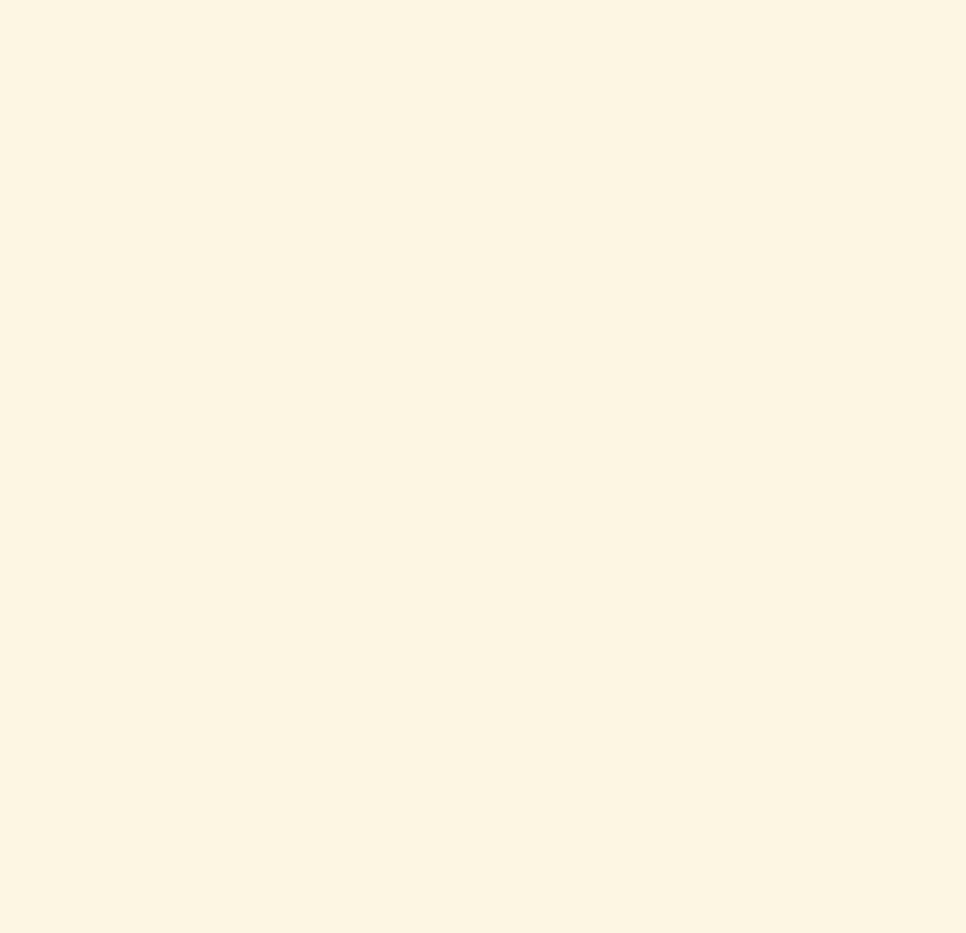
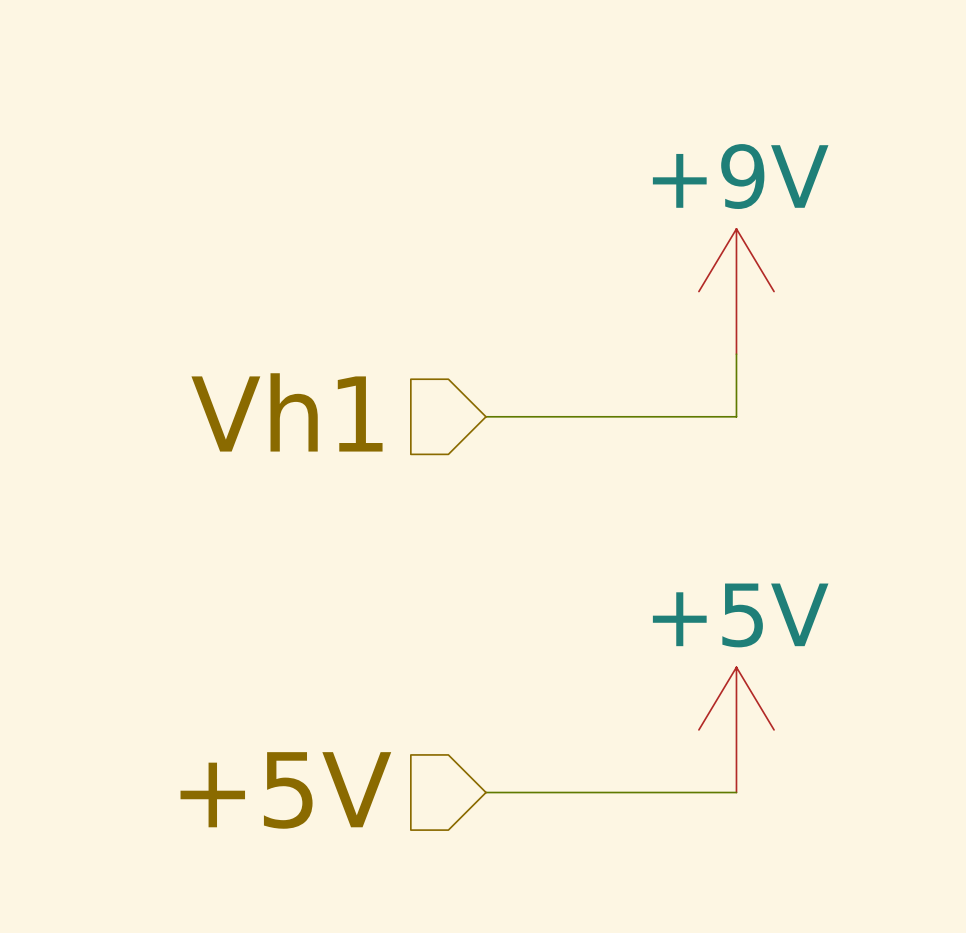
power symbol: none -> +9V (736, 291)
wire: none -> (736, 354) (736, 416) (485, 416)
hierarchical label: none -> Vh1 (287, 412)
power symbol: none -> +5V (736, 729)
hierarchical label: none -> +5V (285, 790)
wire: none -> (485, 792) (736, 792)

